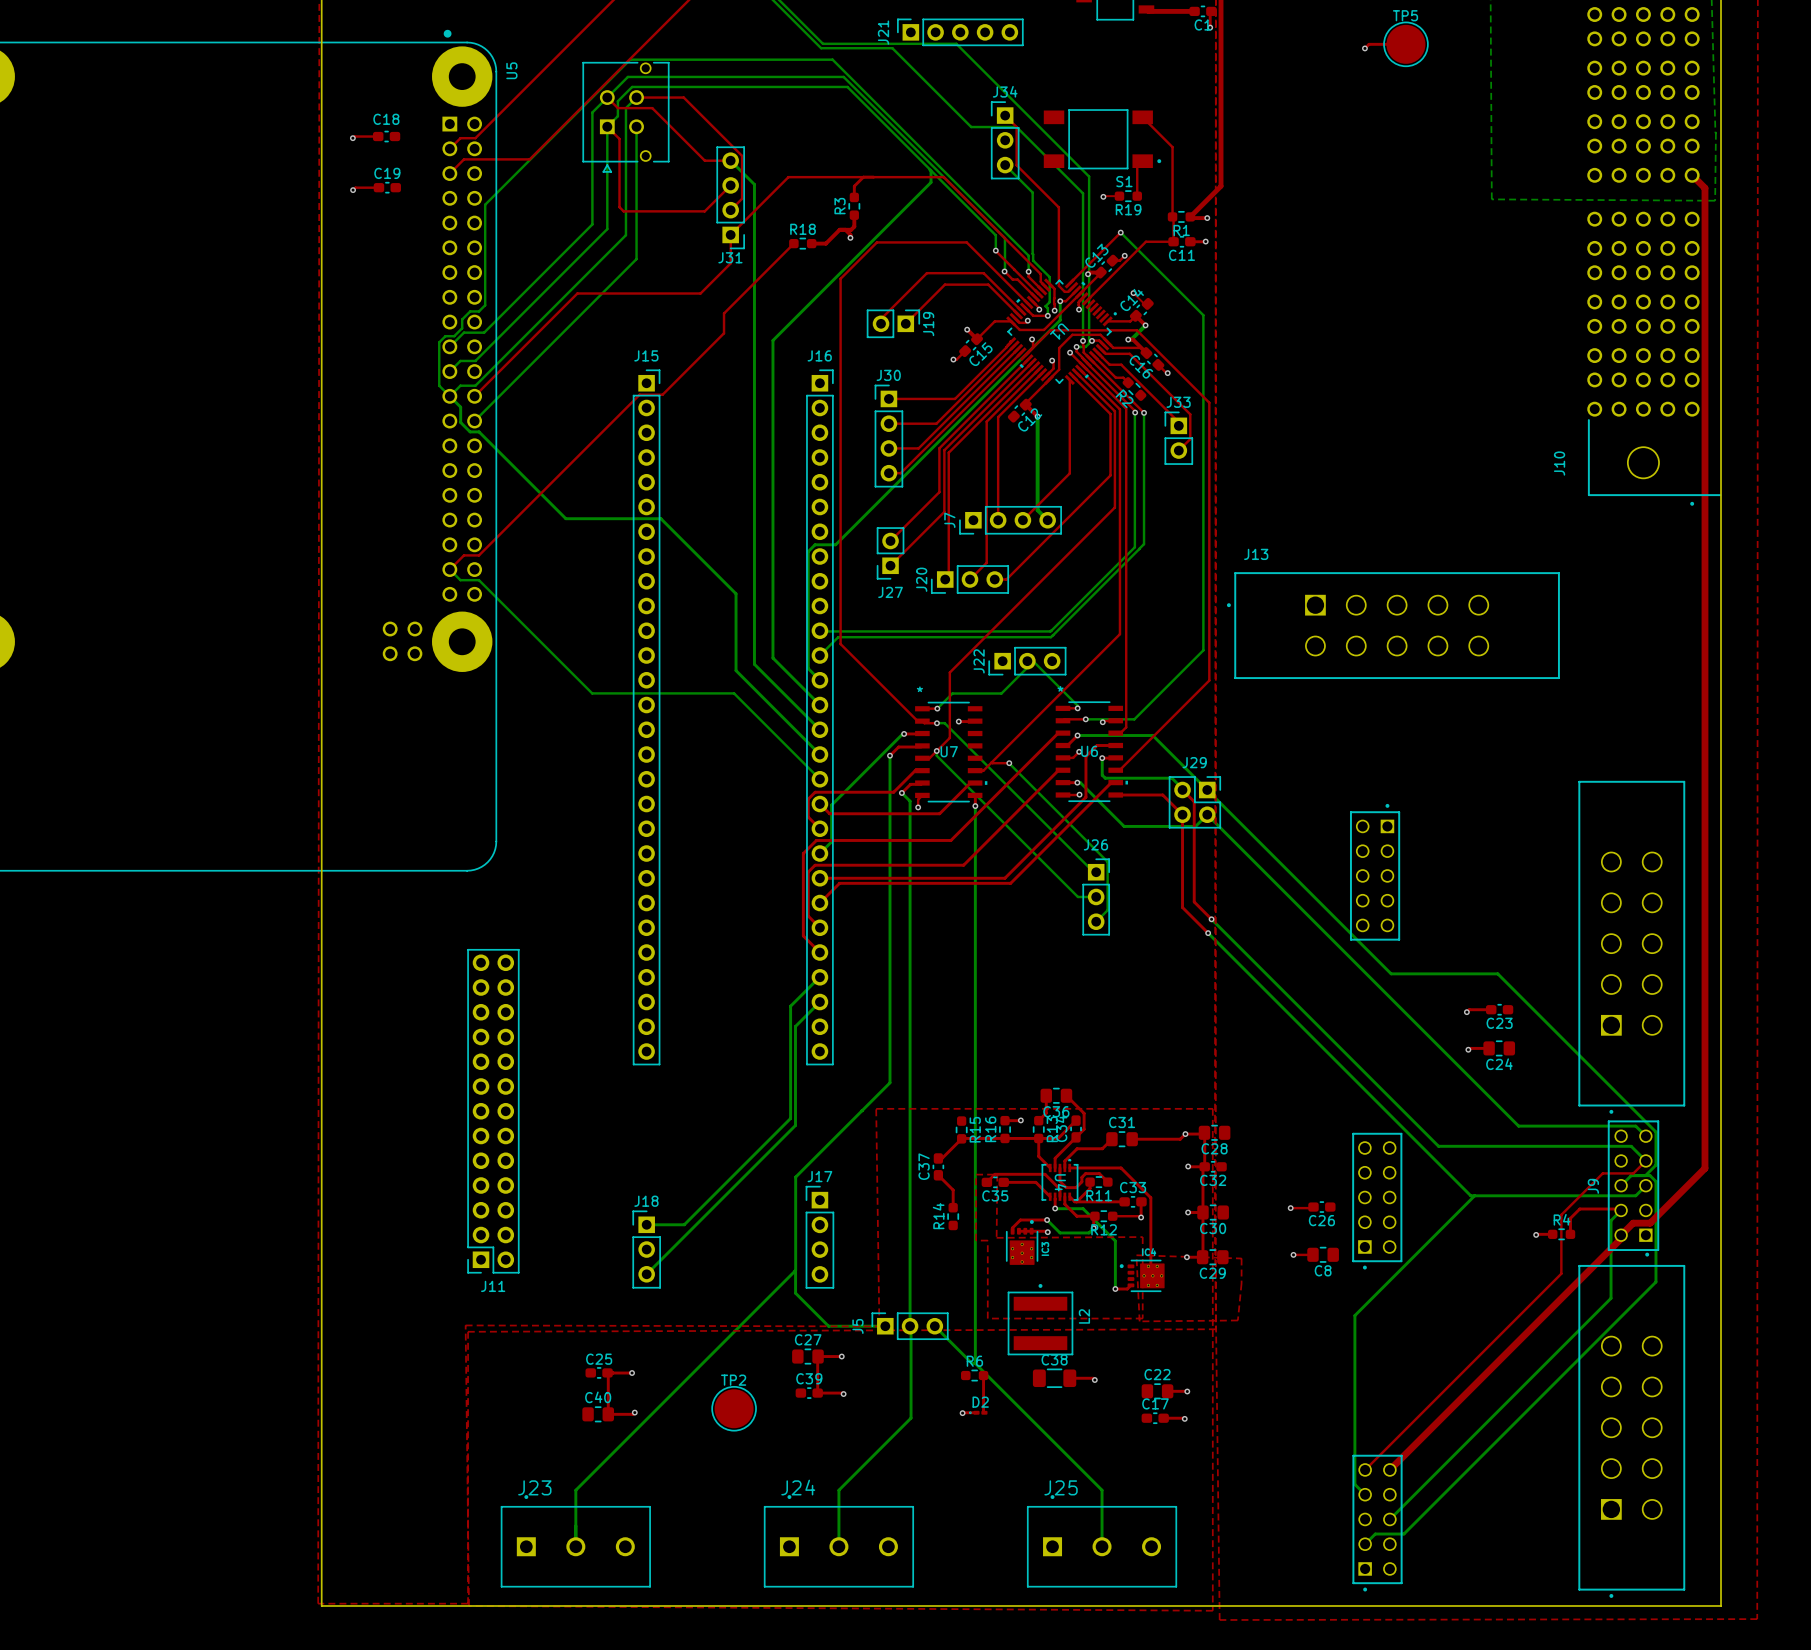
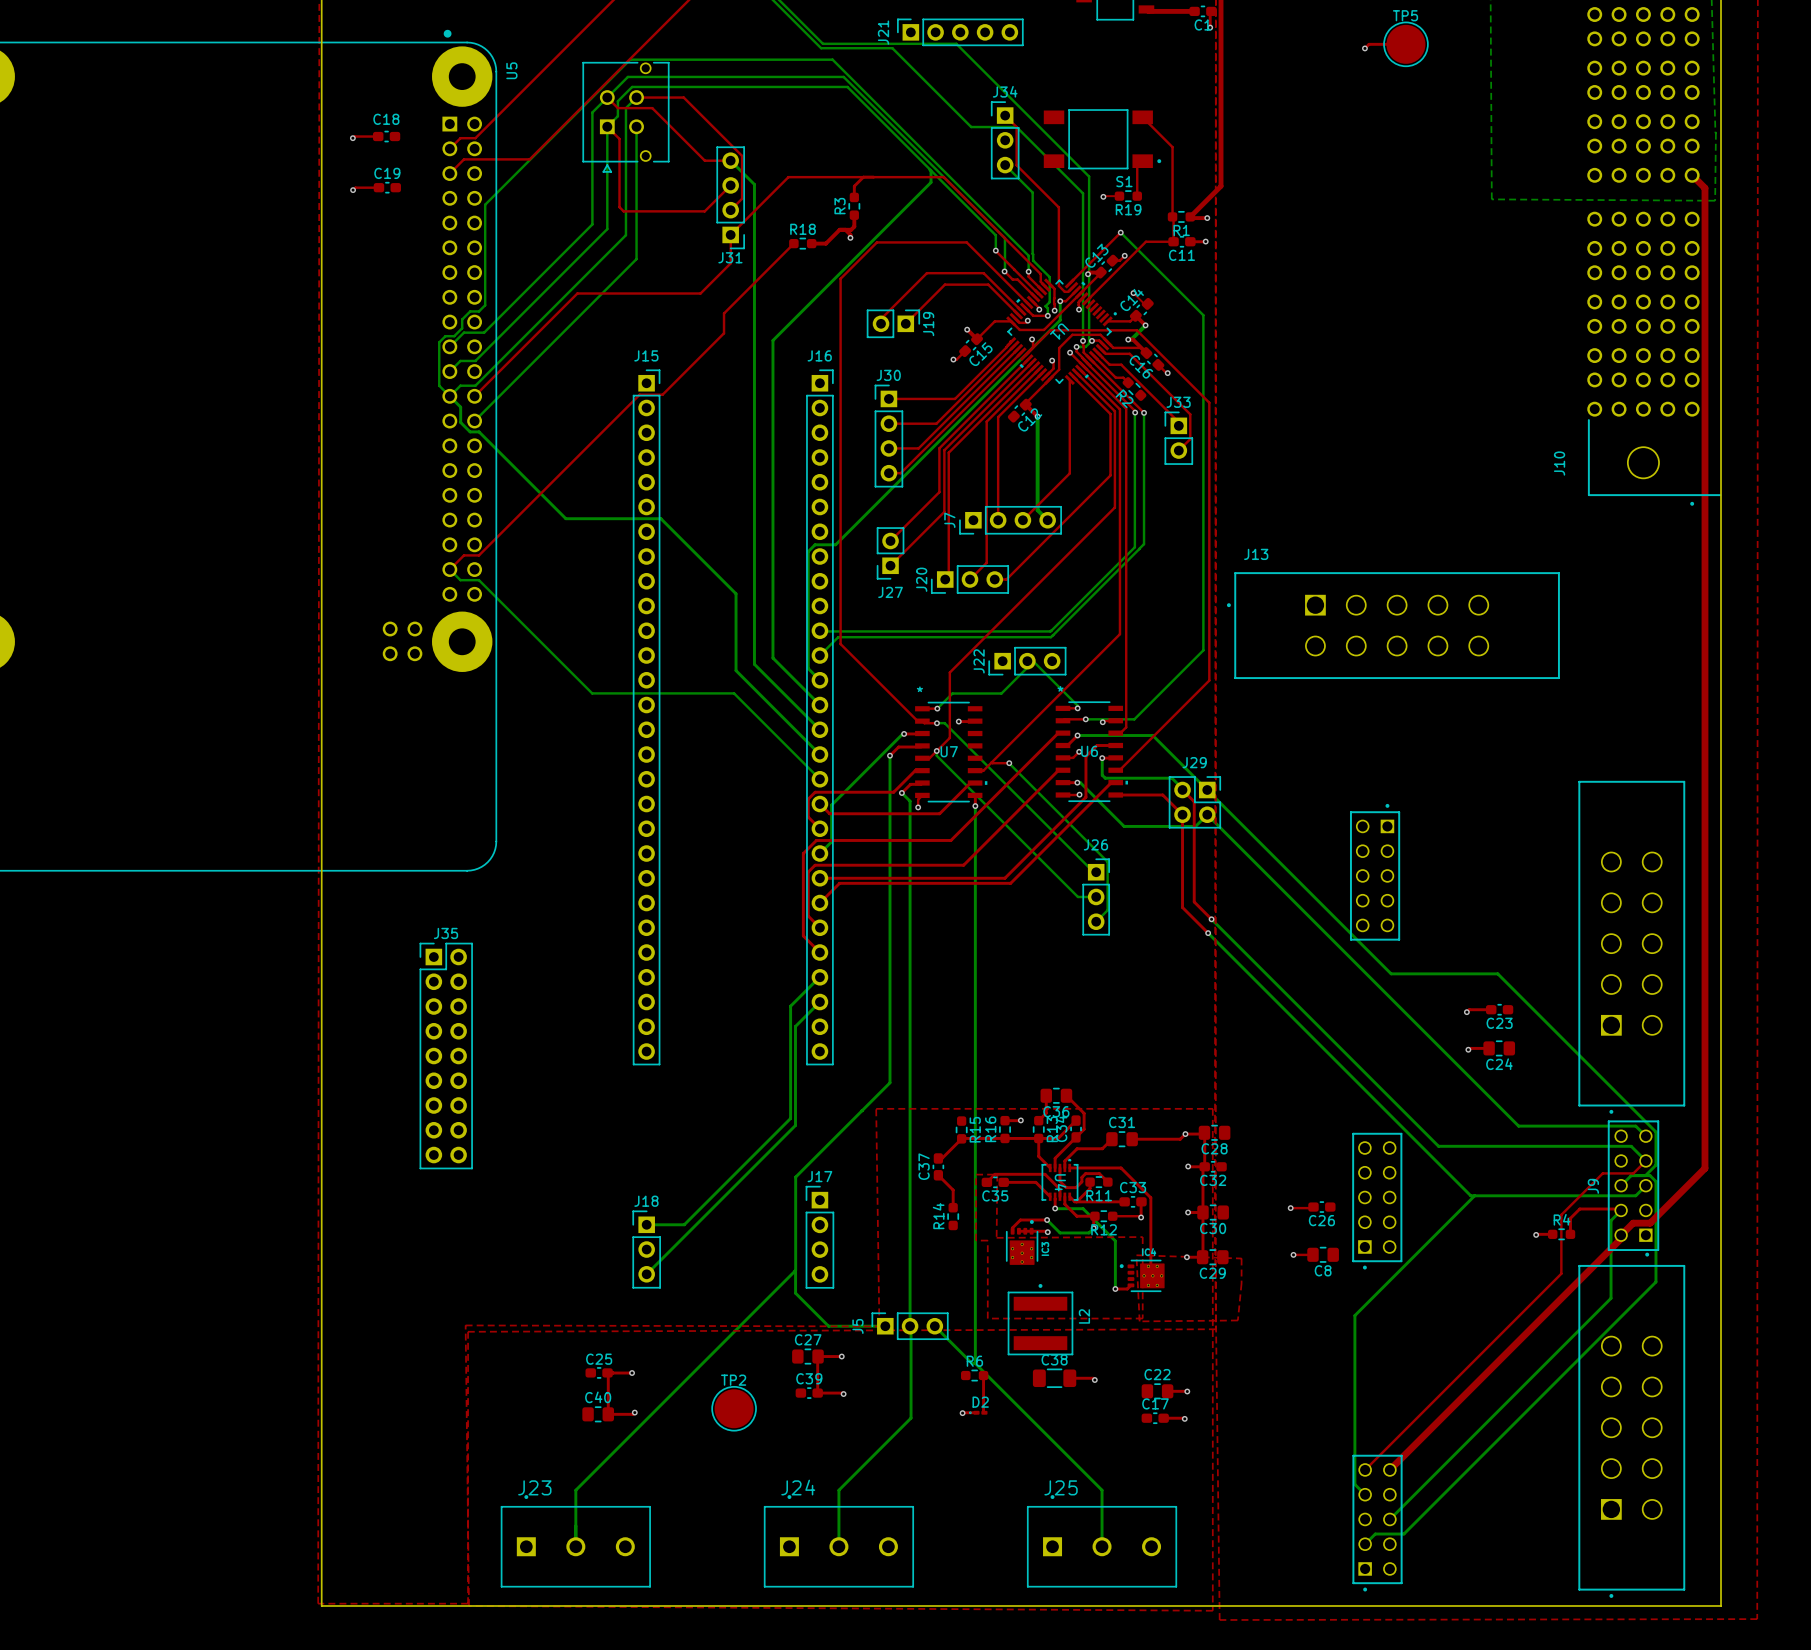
J35: none -> (446, 1056)
J11: (493, 1111) -> none

